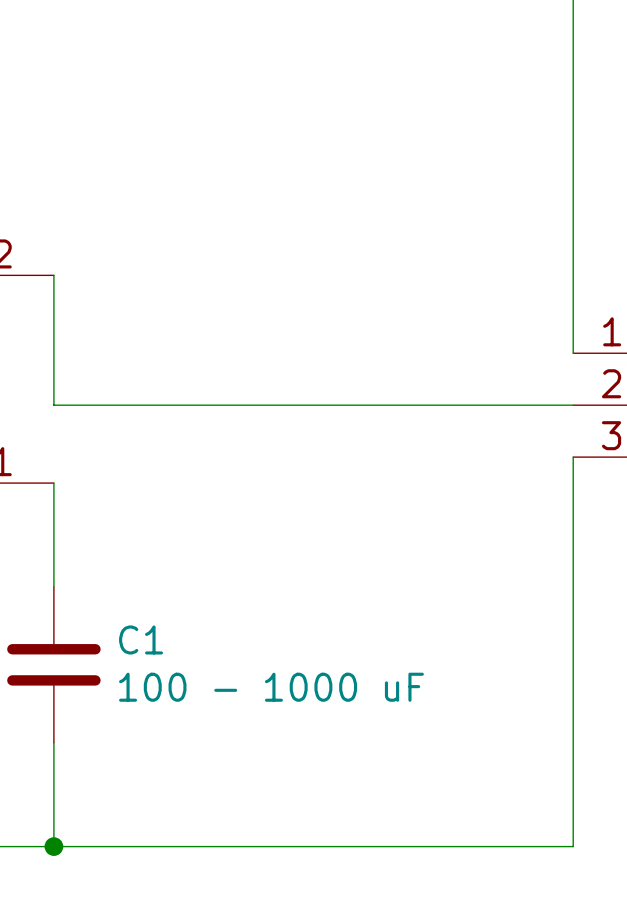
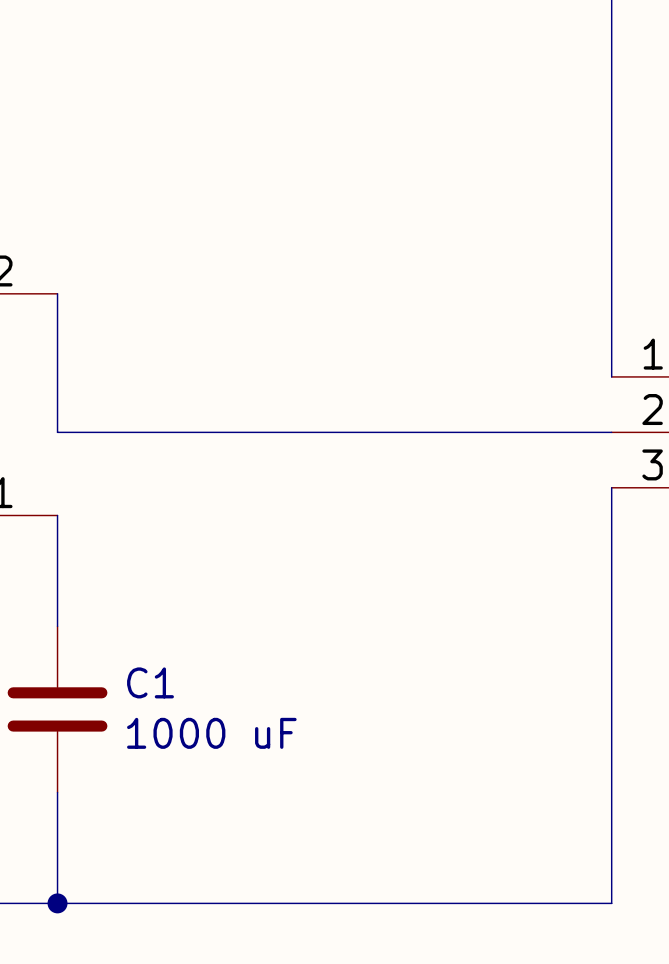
C1 value: 100 - 1000 uF (271, 687) -> 1000 uF (211, 733)

